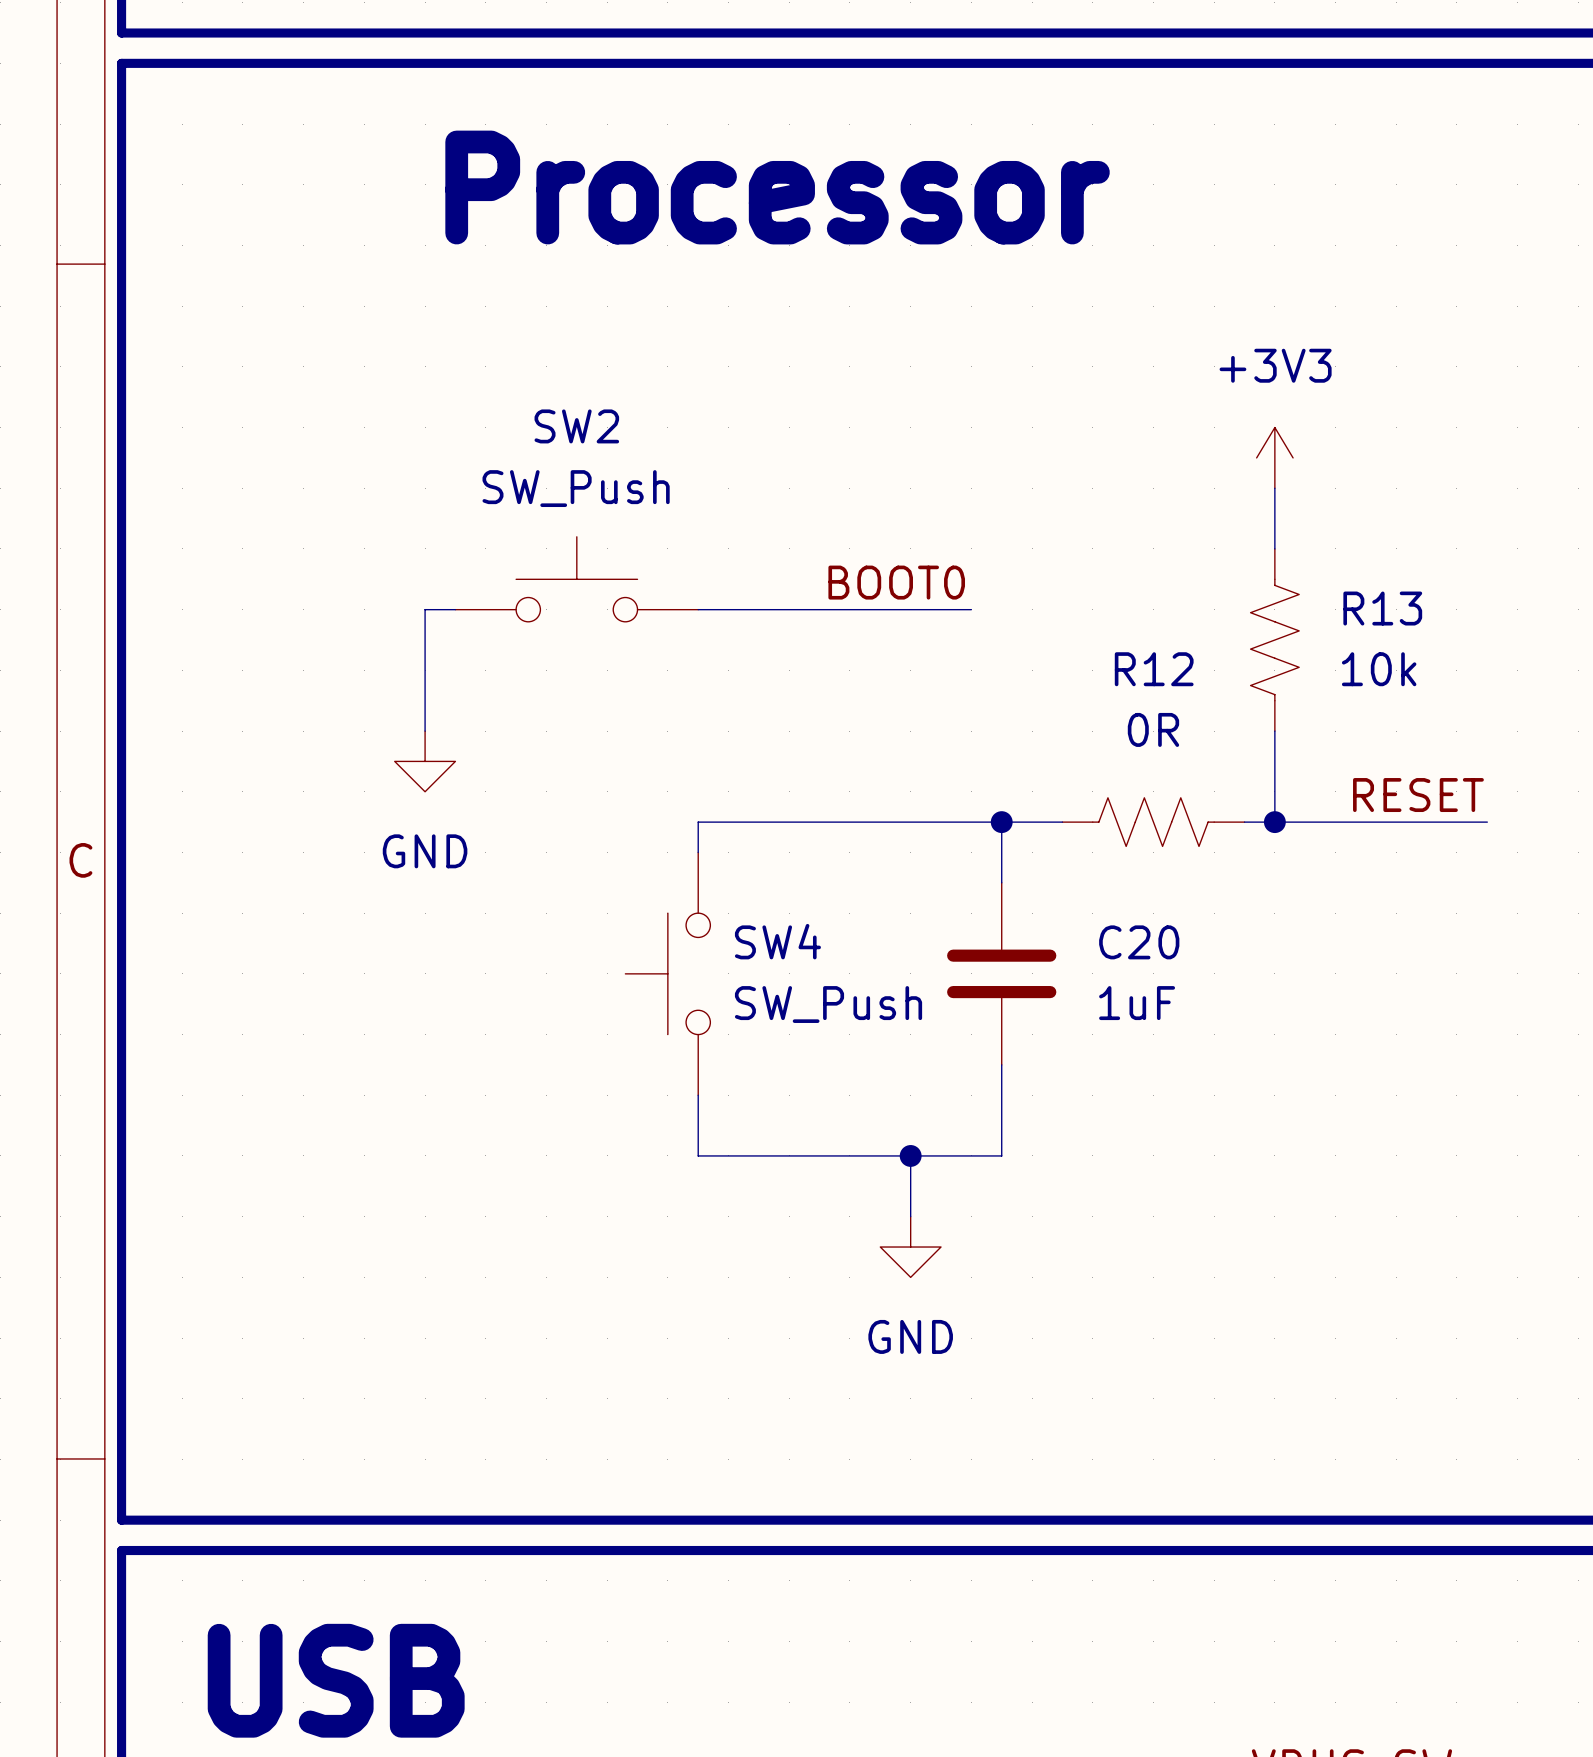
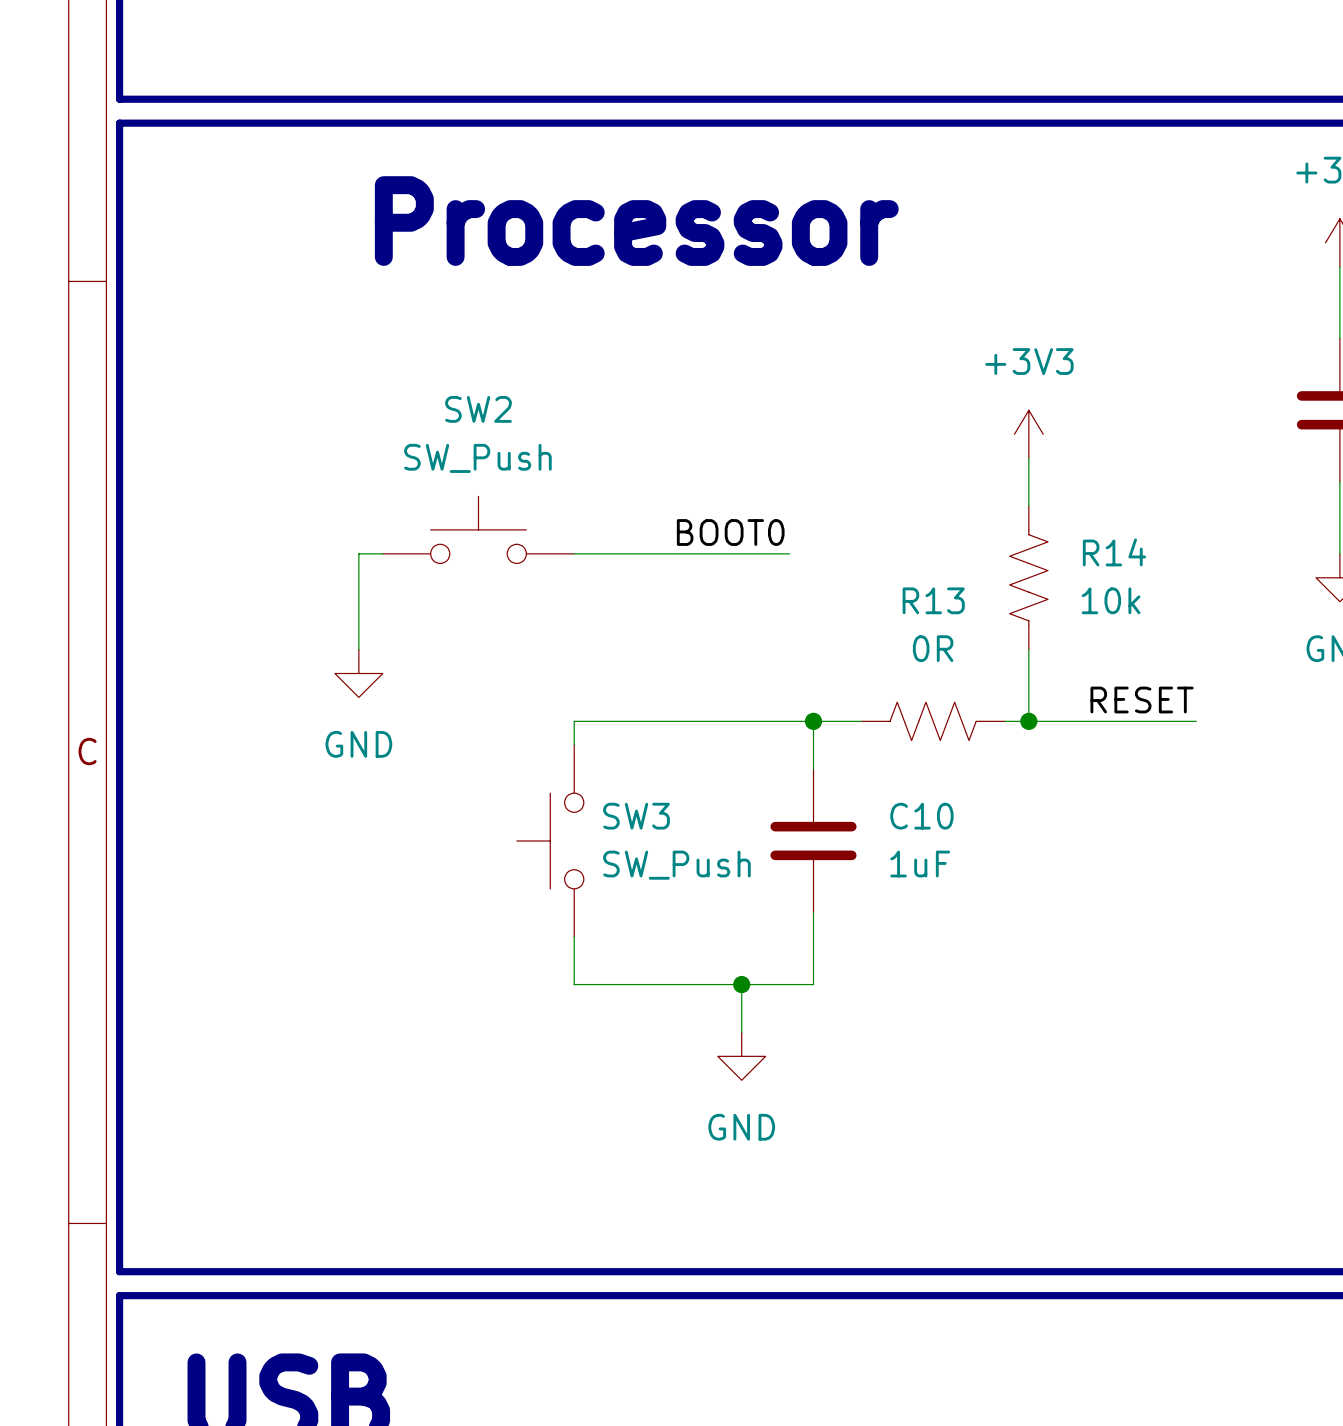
R13 name: R13 (1382, 608) -> R14 (1114, 552)
R12 name: R12 (1154, 669) -> R13 (933, 600)
SW4 name: SW4 (777, 941) -> SW3 (636, 816)
C20 name: C20 (1139, 942) -> C10 (921, 816)

